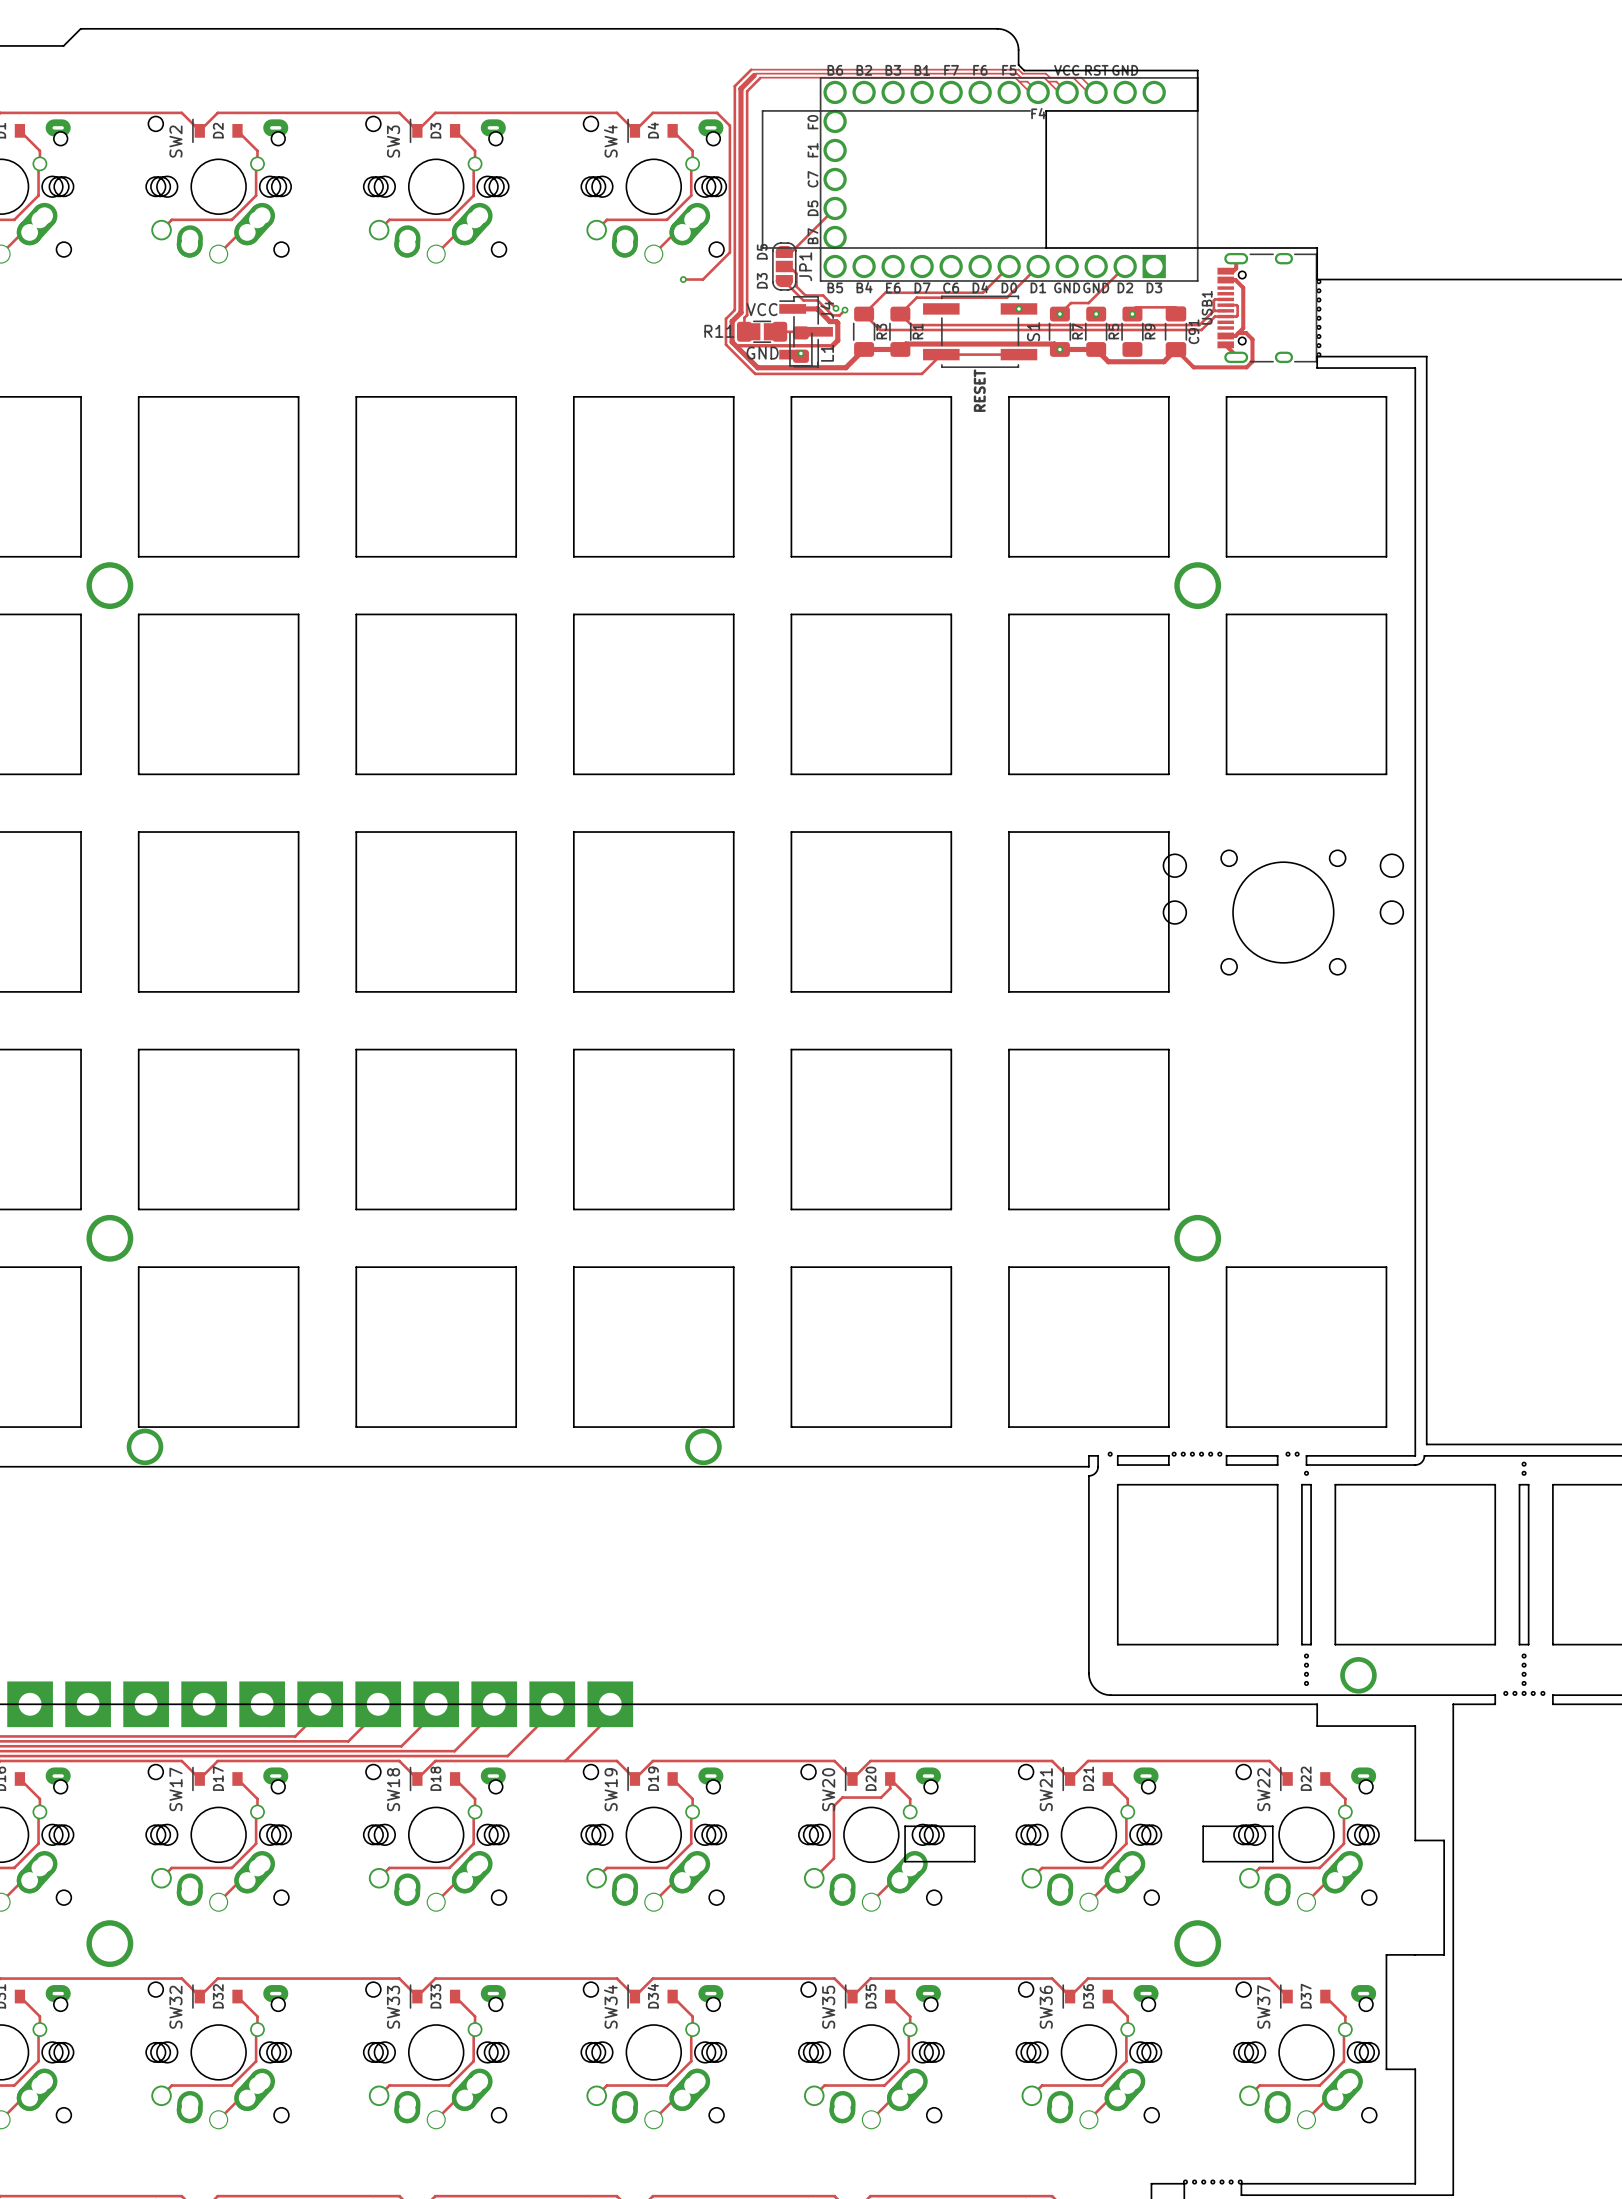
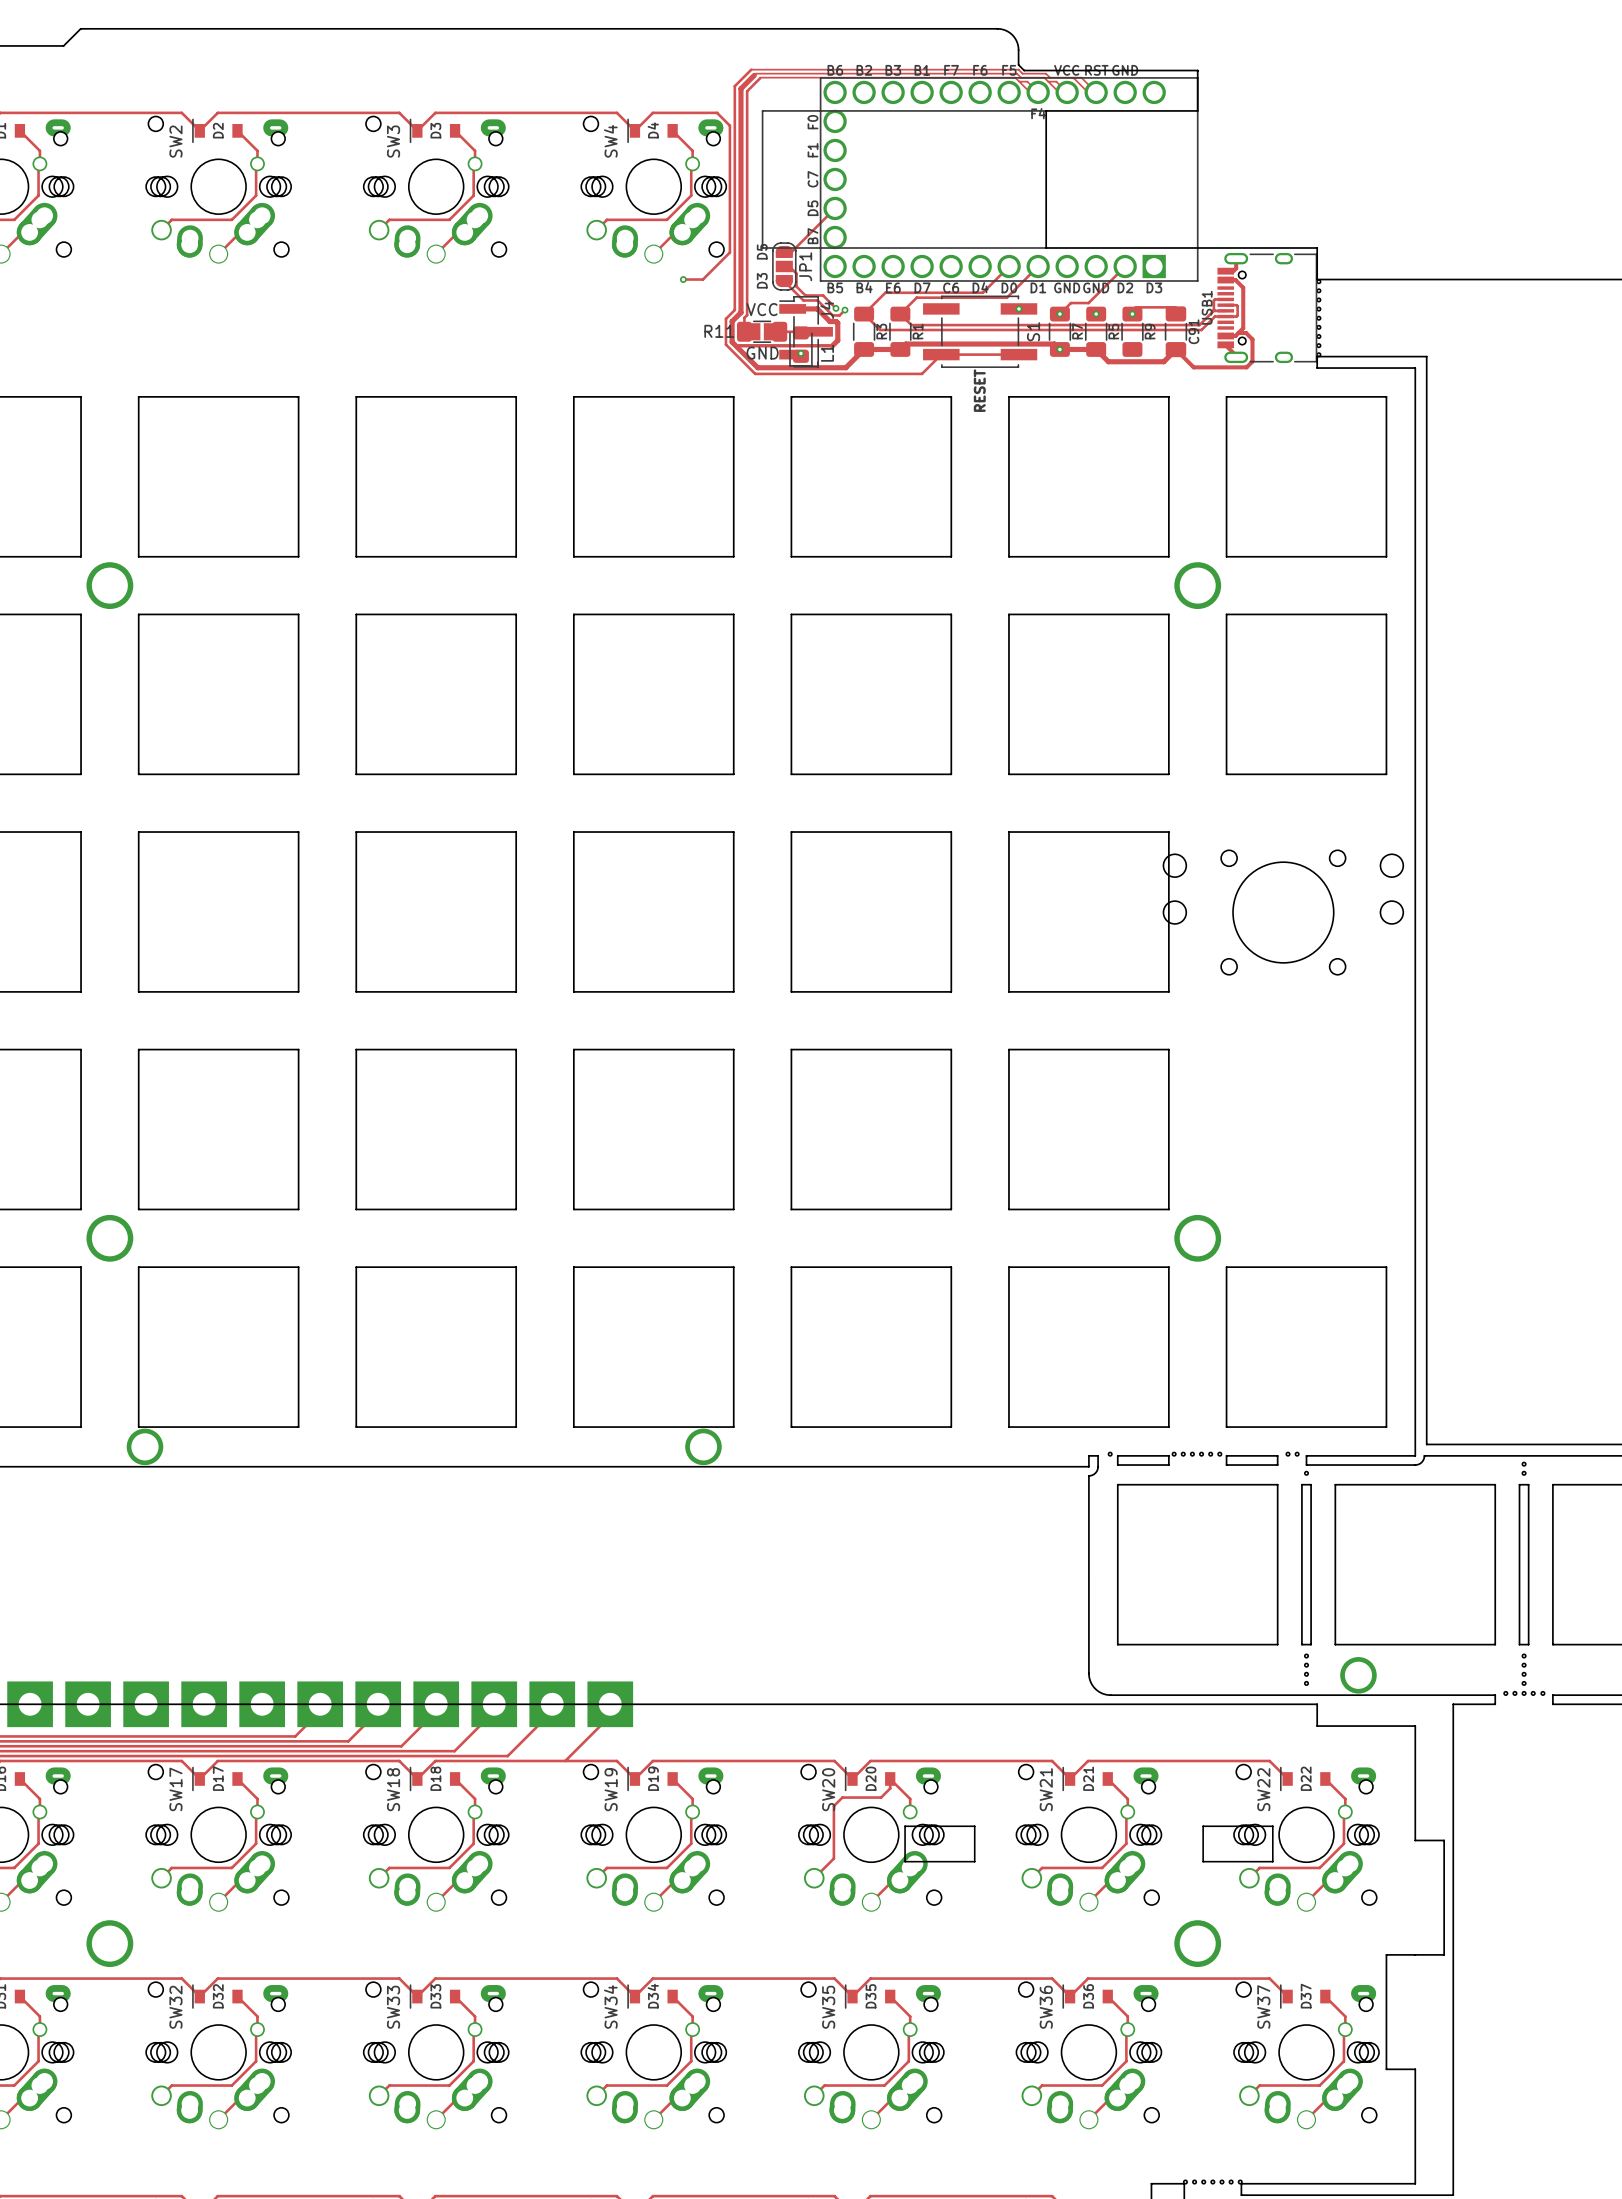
line: none -> (1030, 110) (1046, 110)

